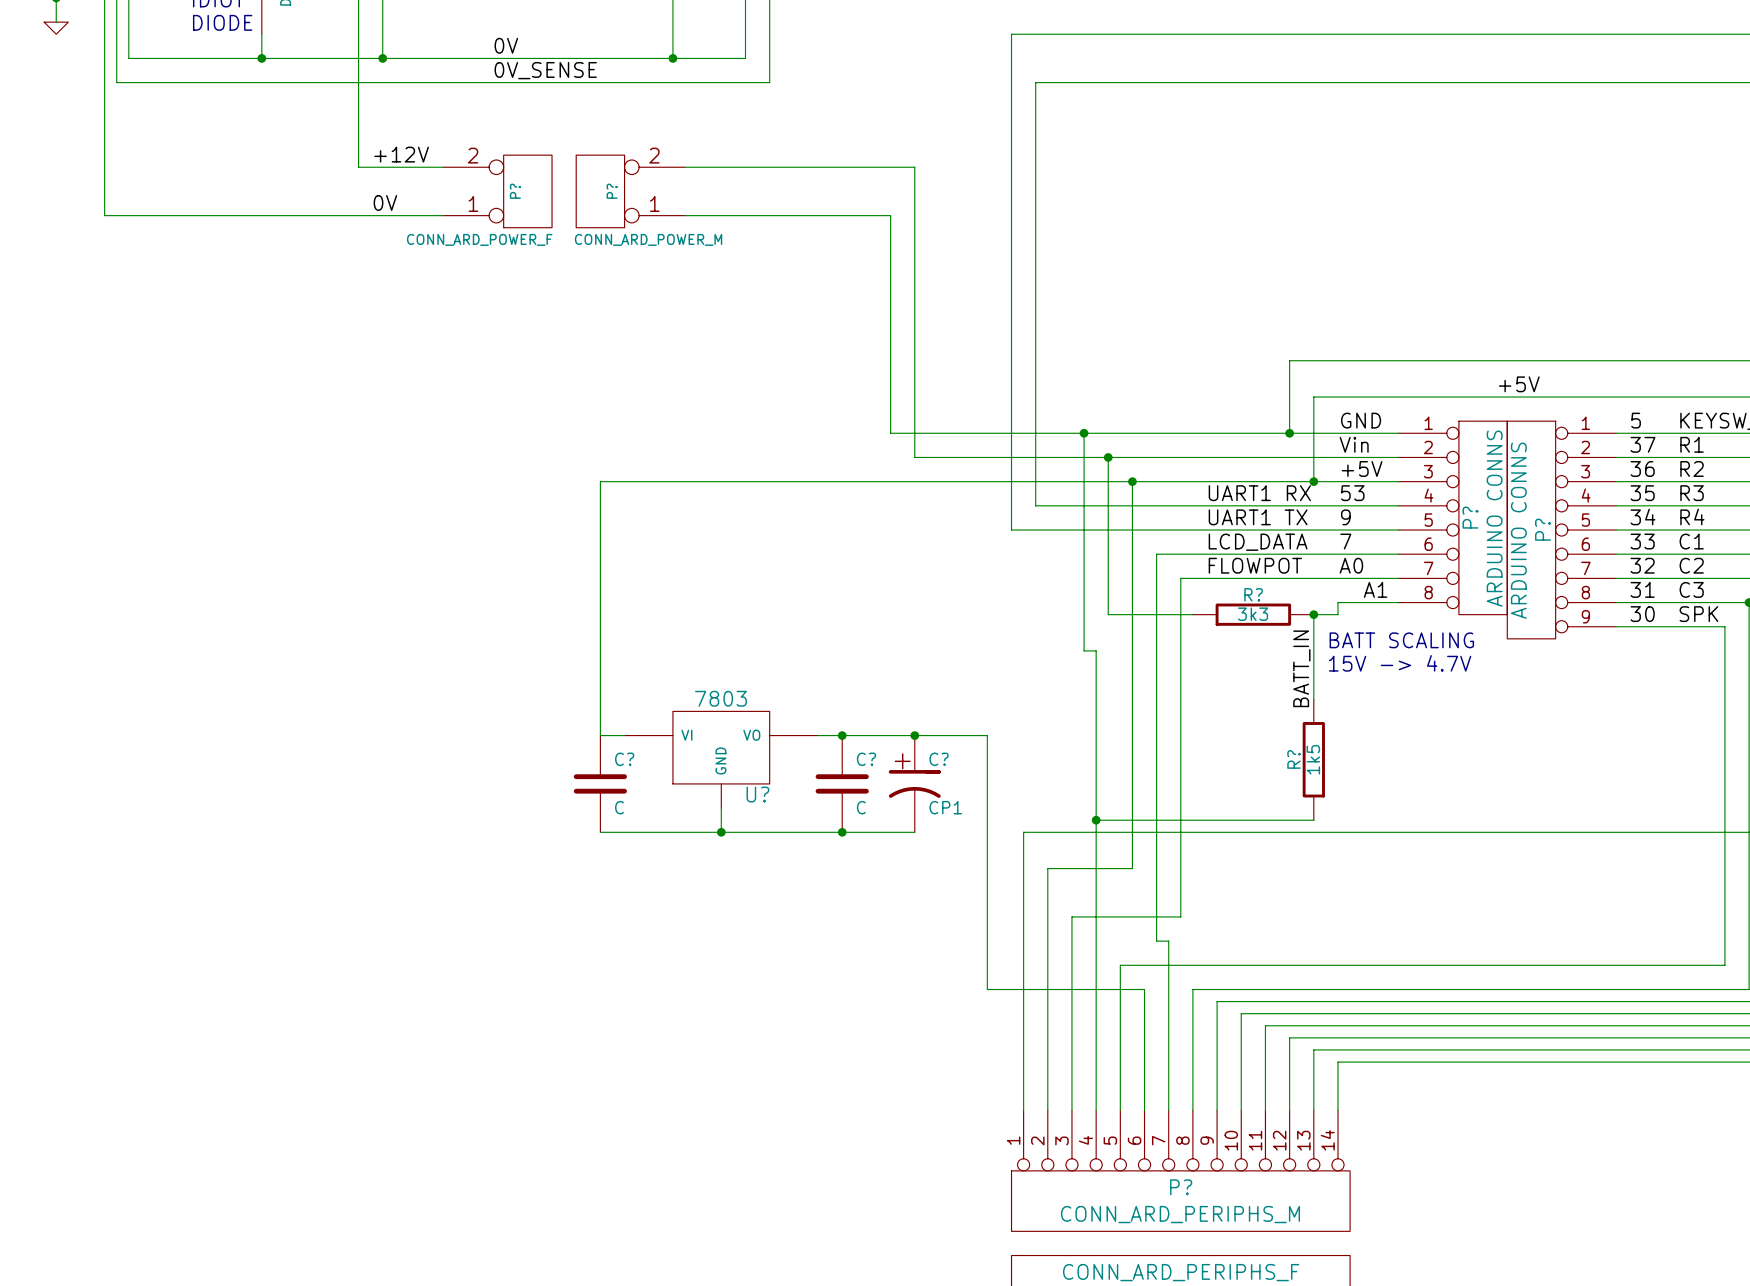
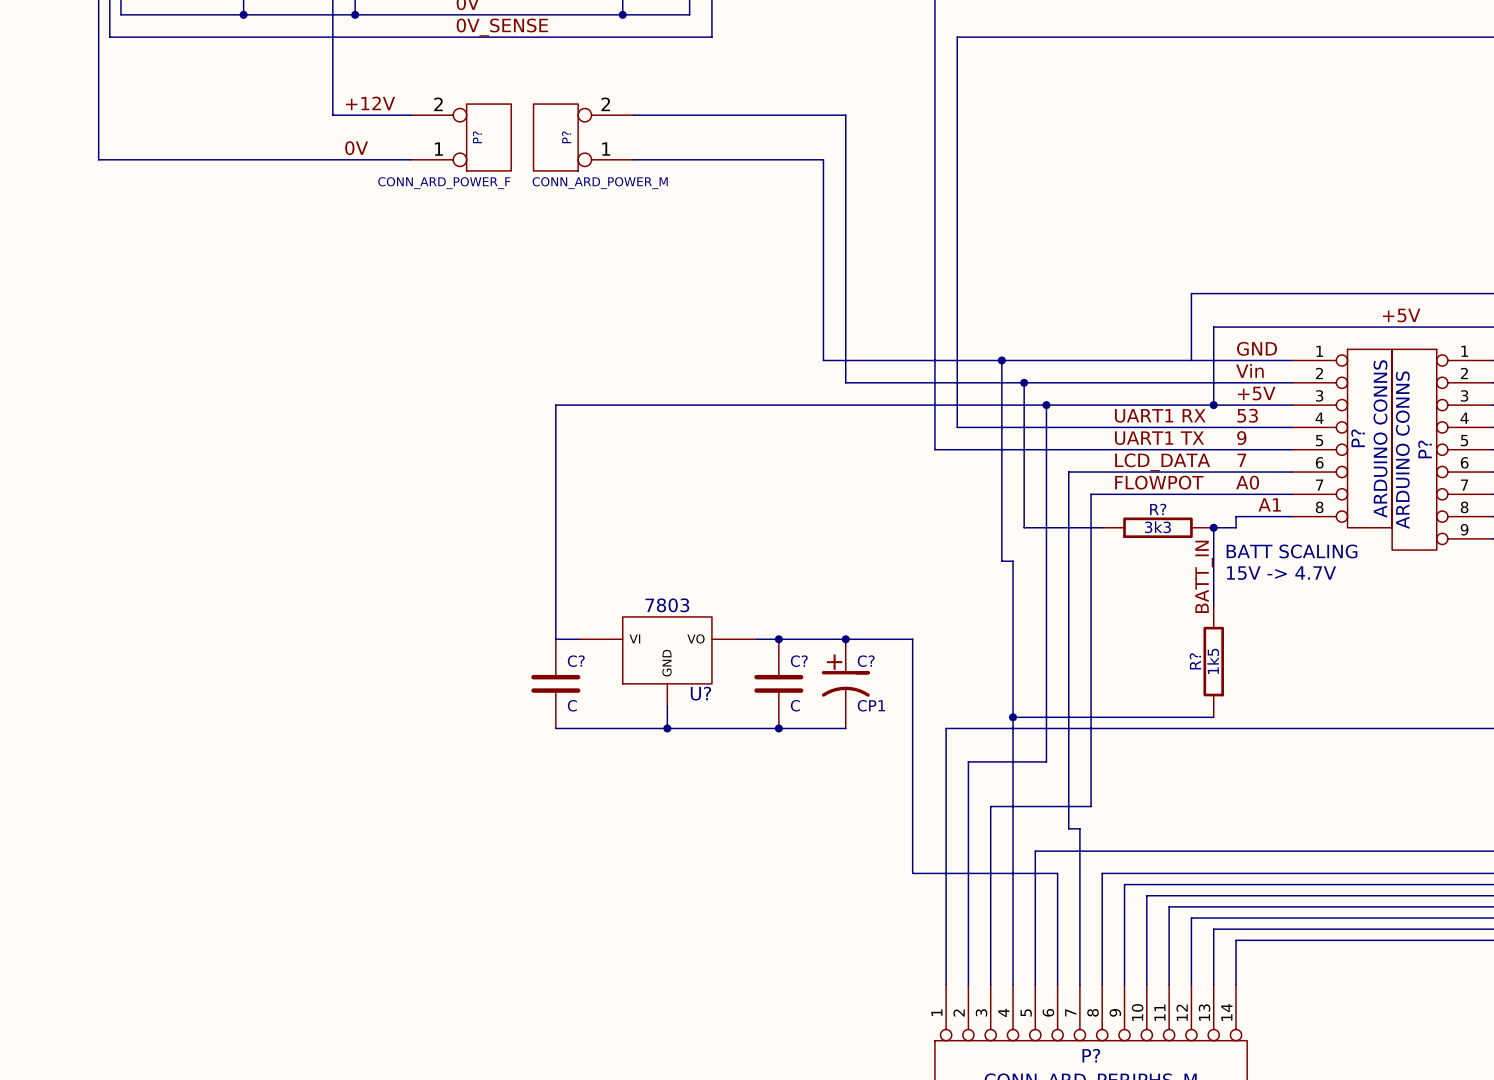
junction: (1289, 433) -> none

